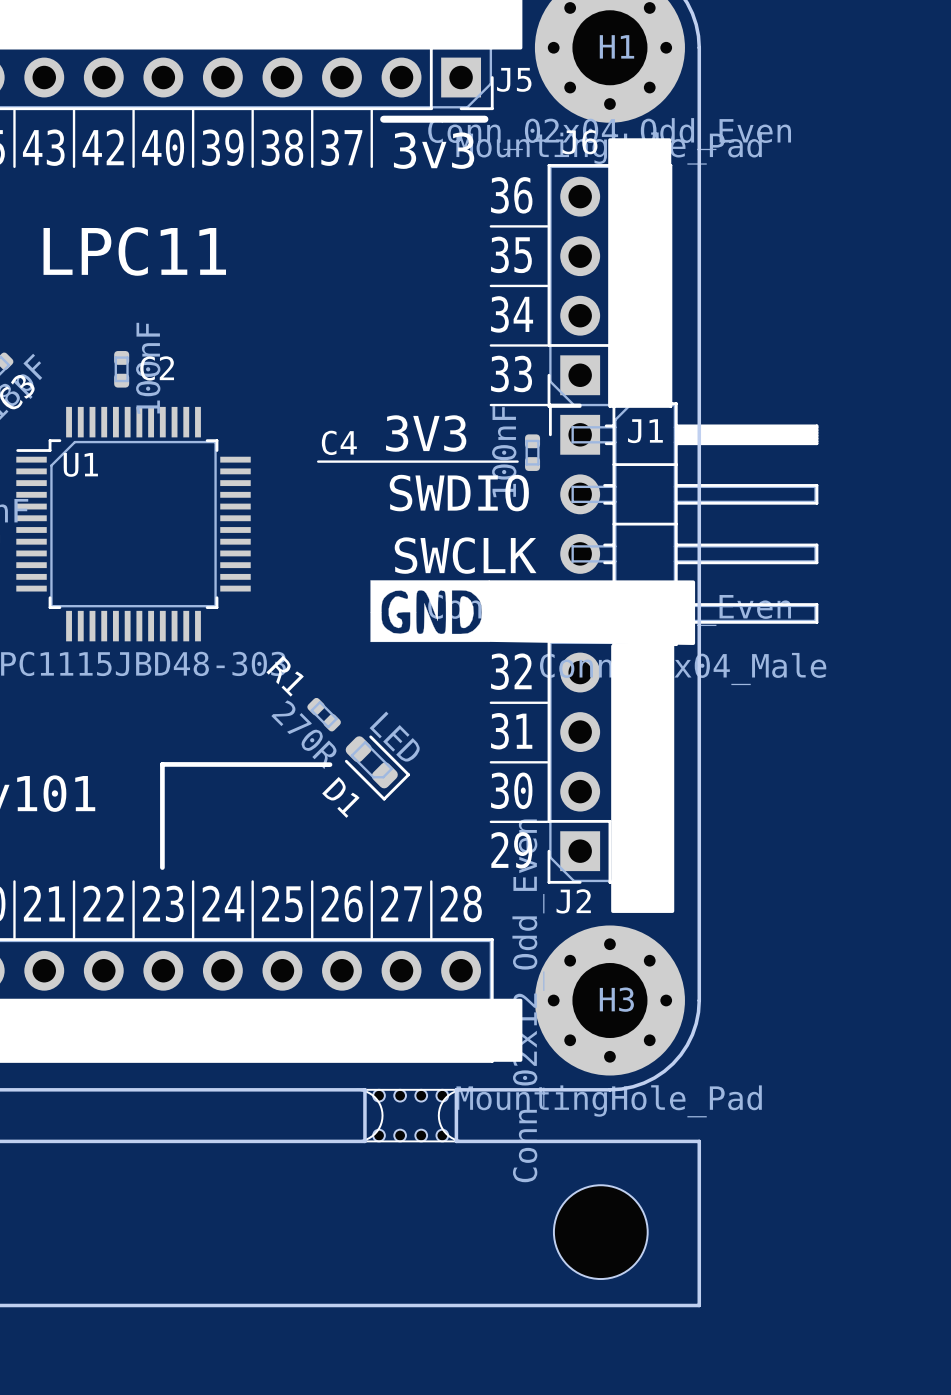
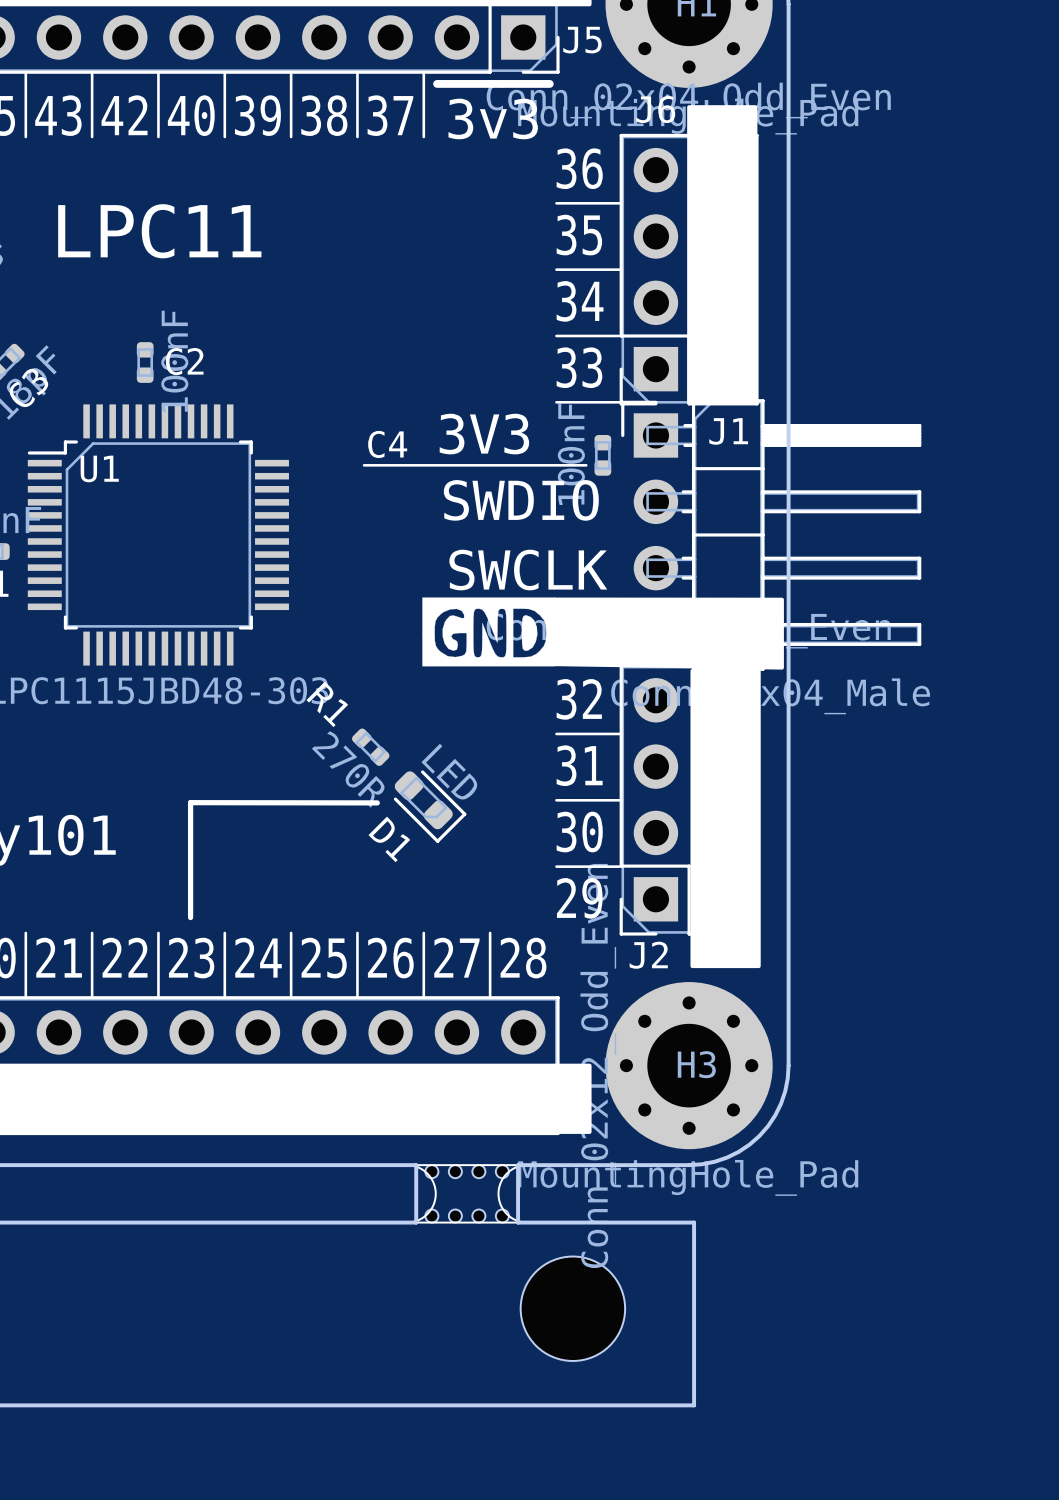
board edge: (614, 1141) (699, 1141) (699, 1305) (614, 1305) -> (694, 1222) (694, 1405)
part position: (600, 1232) -> (572, 1308)

